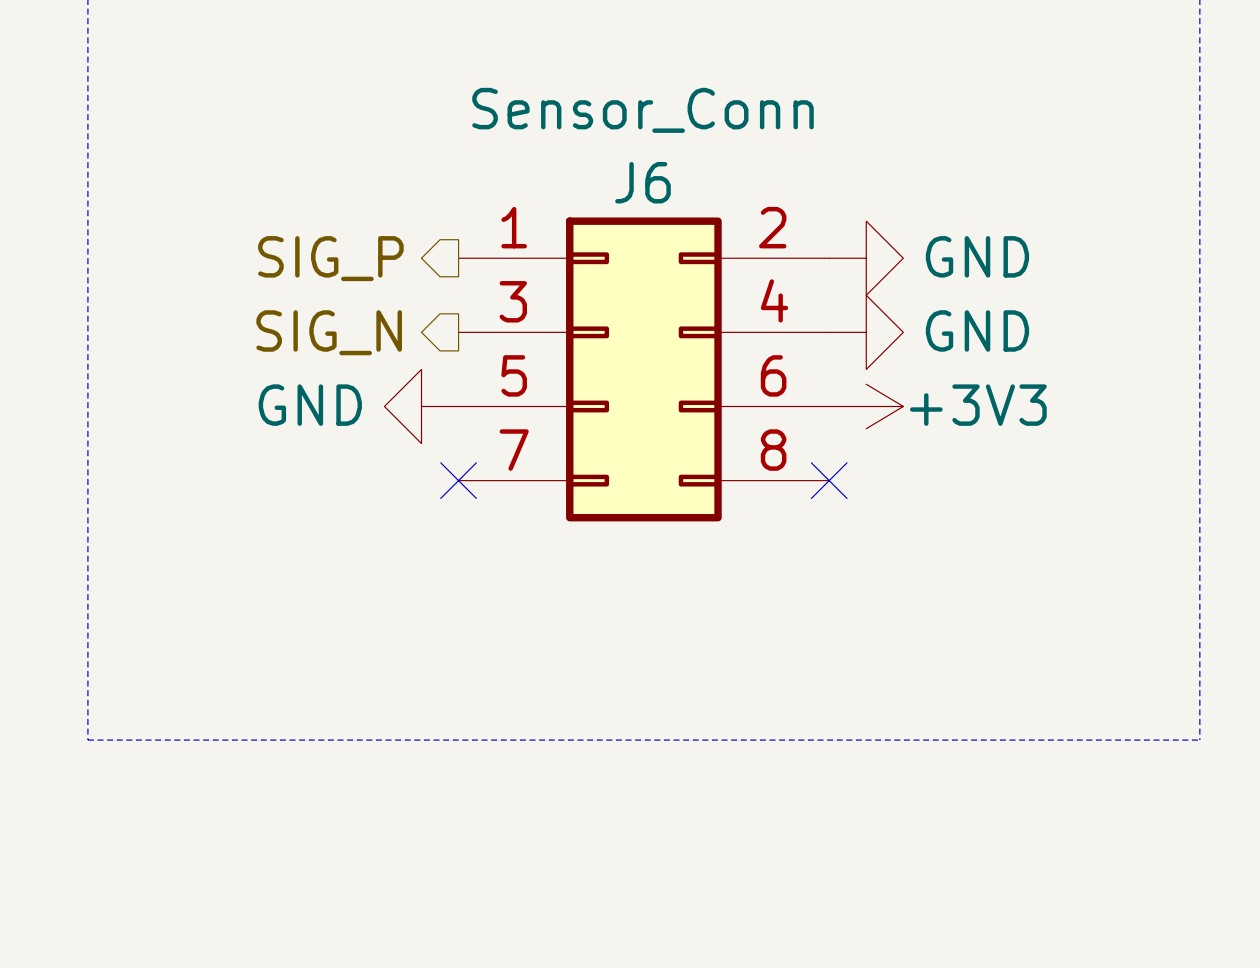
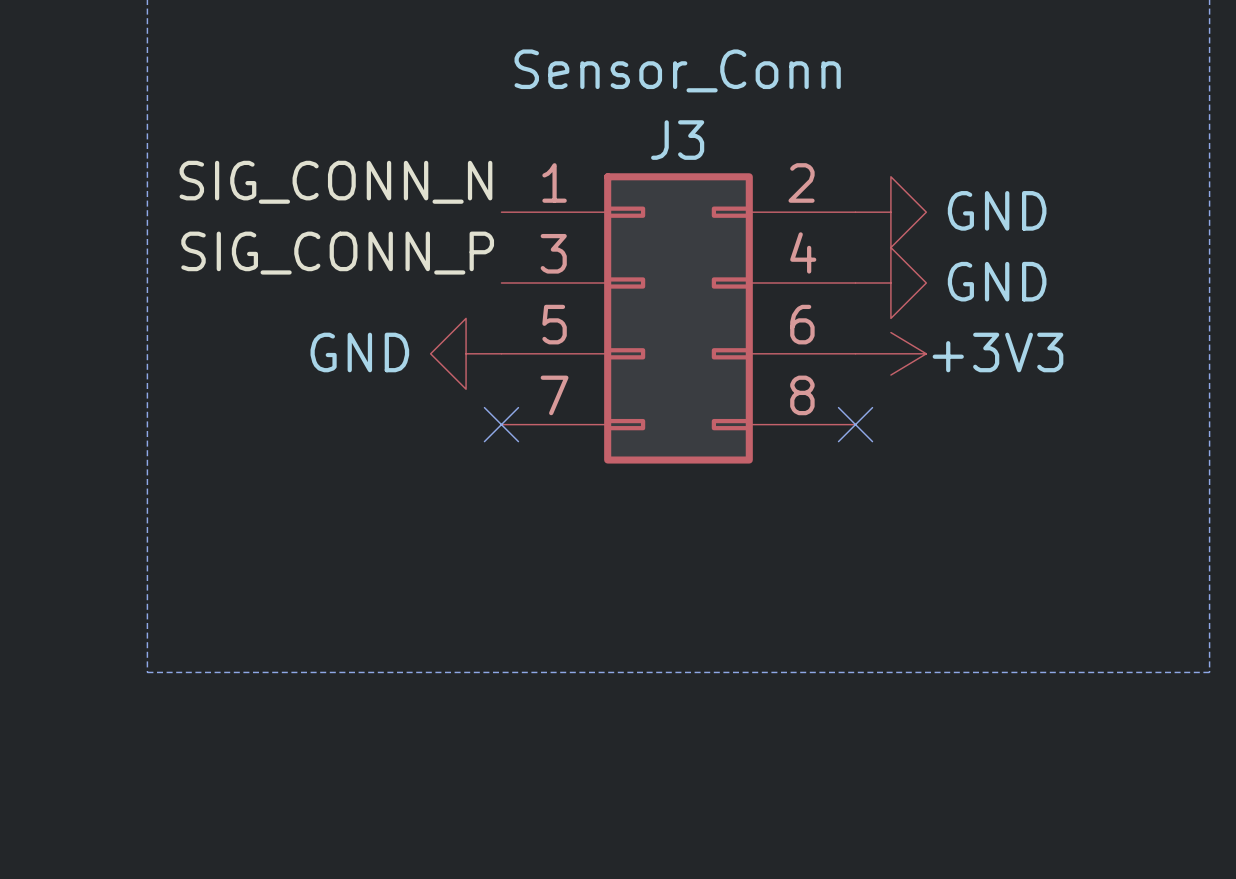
J6 name: J6 (643, 182) -> J3 (677, 140)
label: none -> SIG_CONN_N (335, 182)
hierarchical label: SIG_P (330, 258) -> none
label: none -> SIG_CONN_P (337, 253)
hierarchical label: SIG_N (329, 332) -> none

